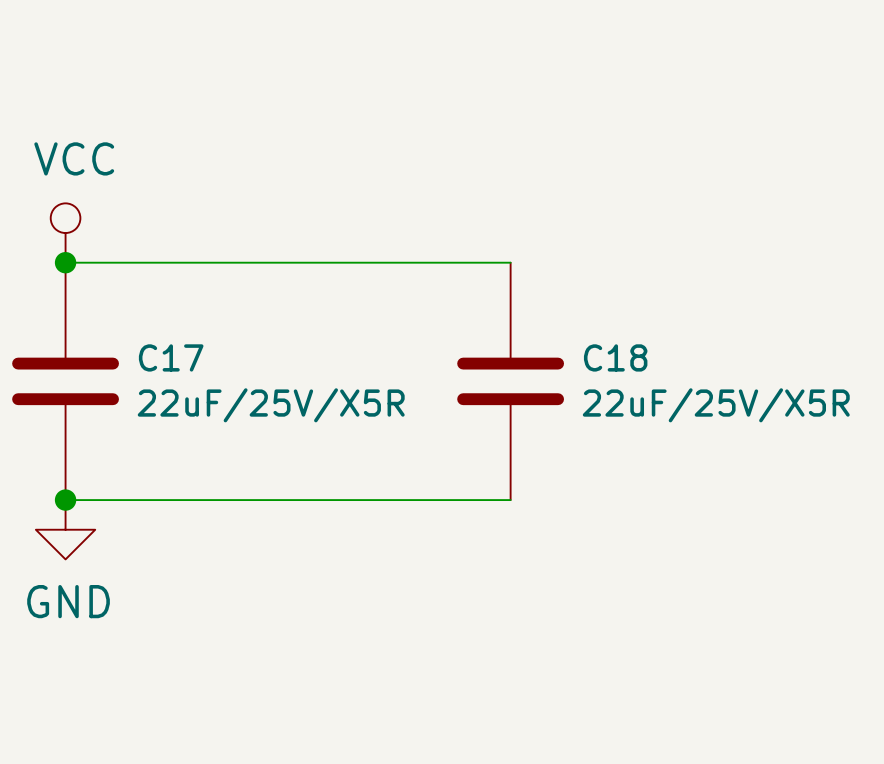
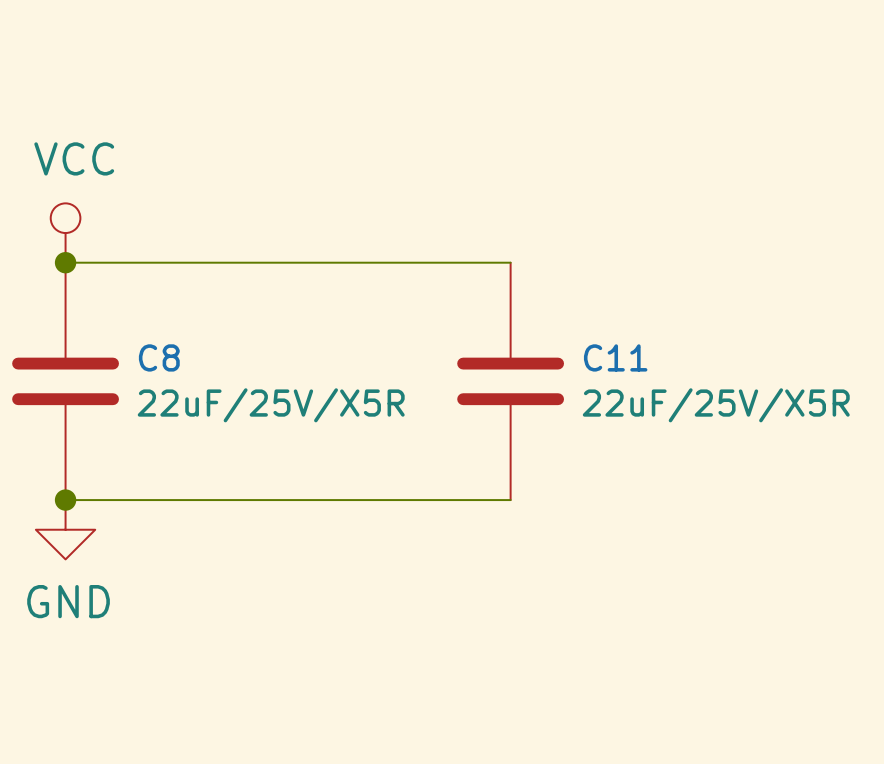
C17 name: C17 (171, 357) -> C8 (159, 357)
C18 name: C18 (615, 357) -> C11 (615, 357)

